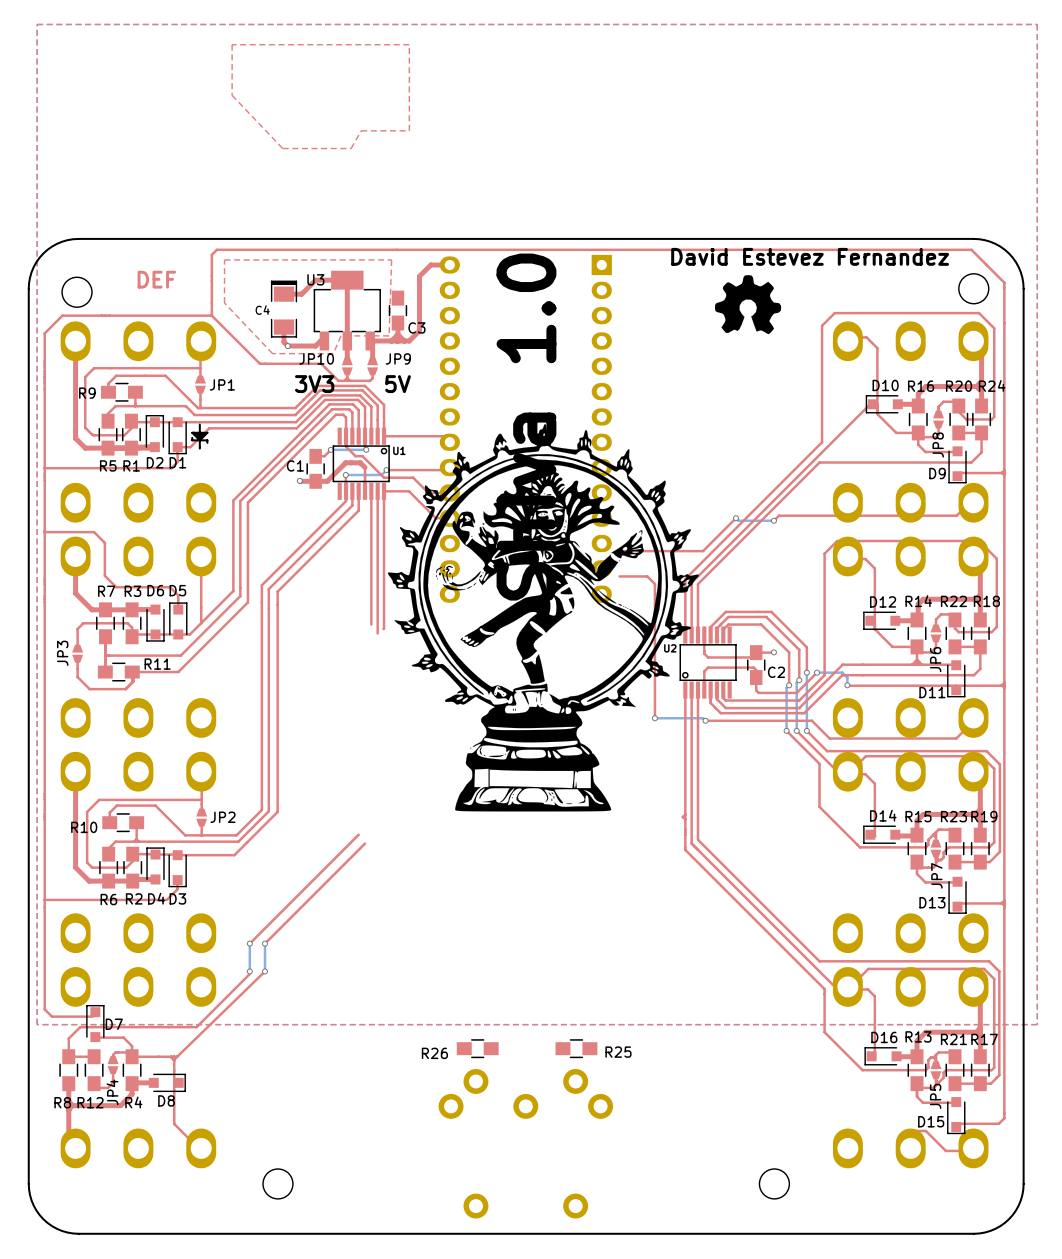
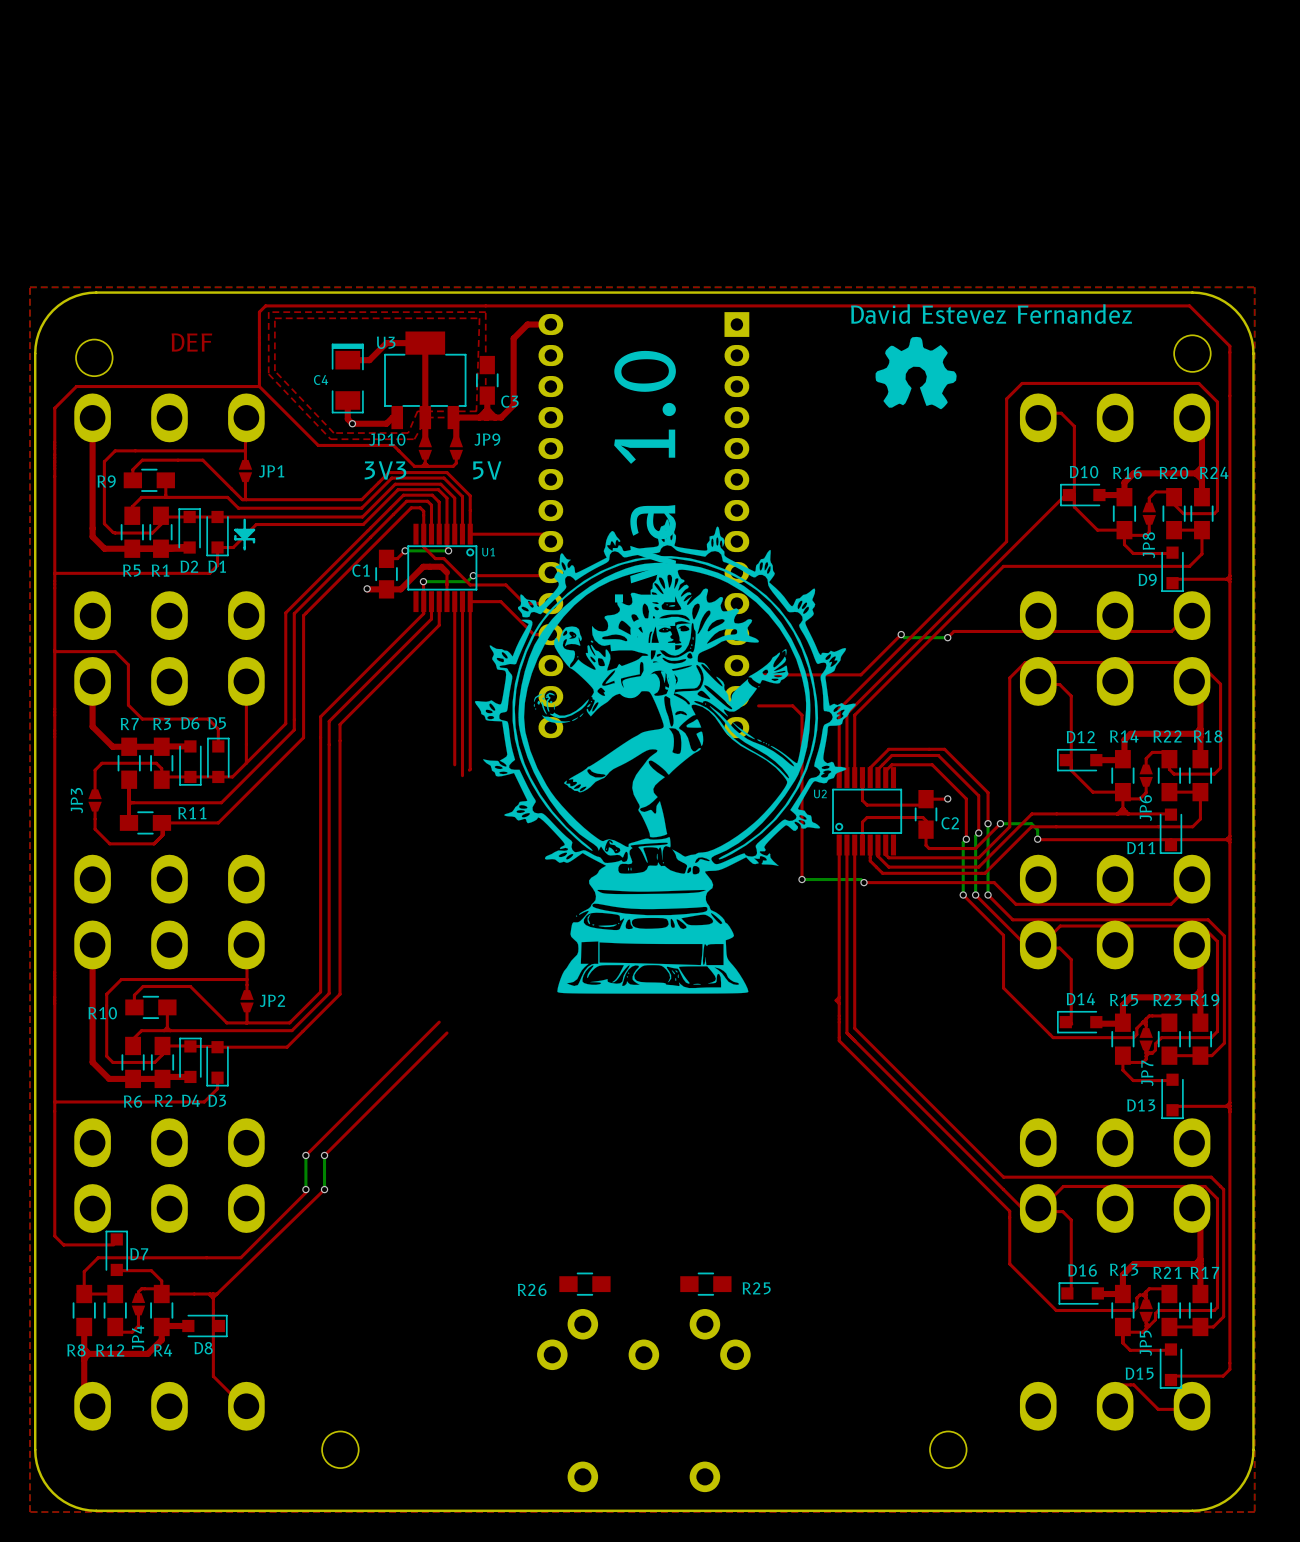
top zone outline: (37, 24) (37, 1024) (1037, 1024) (1037, 24) (37, 24) -> (29, 287) (29, 1512) (1254, 1512) (1254, 287) (29, 287)
top zone outline: (232, 44) (232, 95) (282, 148) (351, 148) (361, 130) (409, 130) (409, 44) (232, 44) -> (268, 312) (268, 374) (330, 439) (414, 439) (426, 417) (485, 417) (485, 312) (268, 312)

